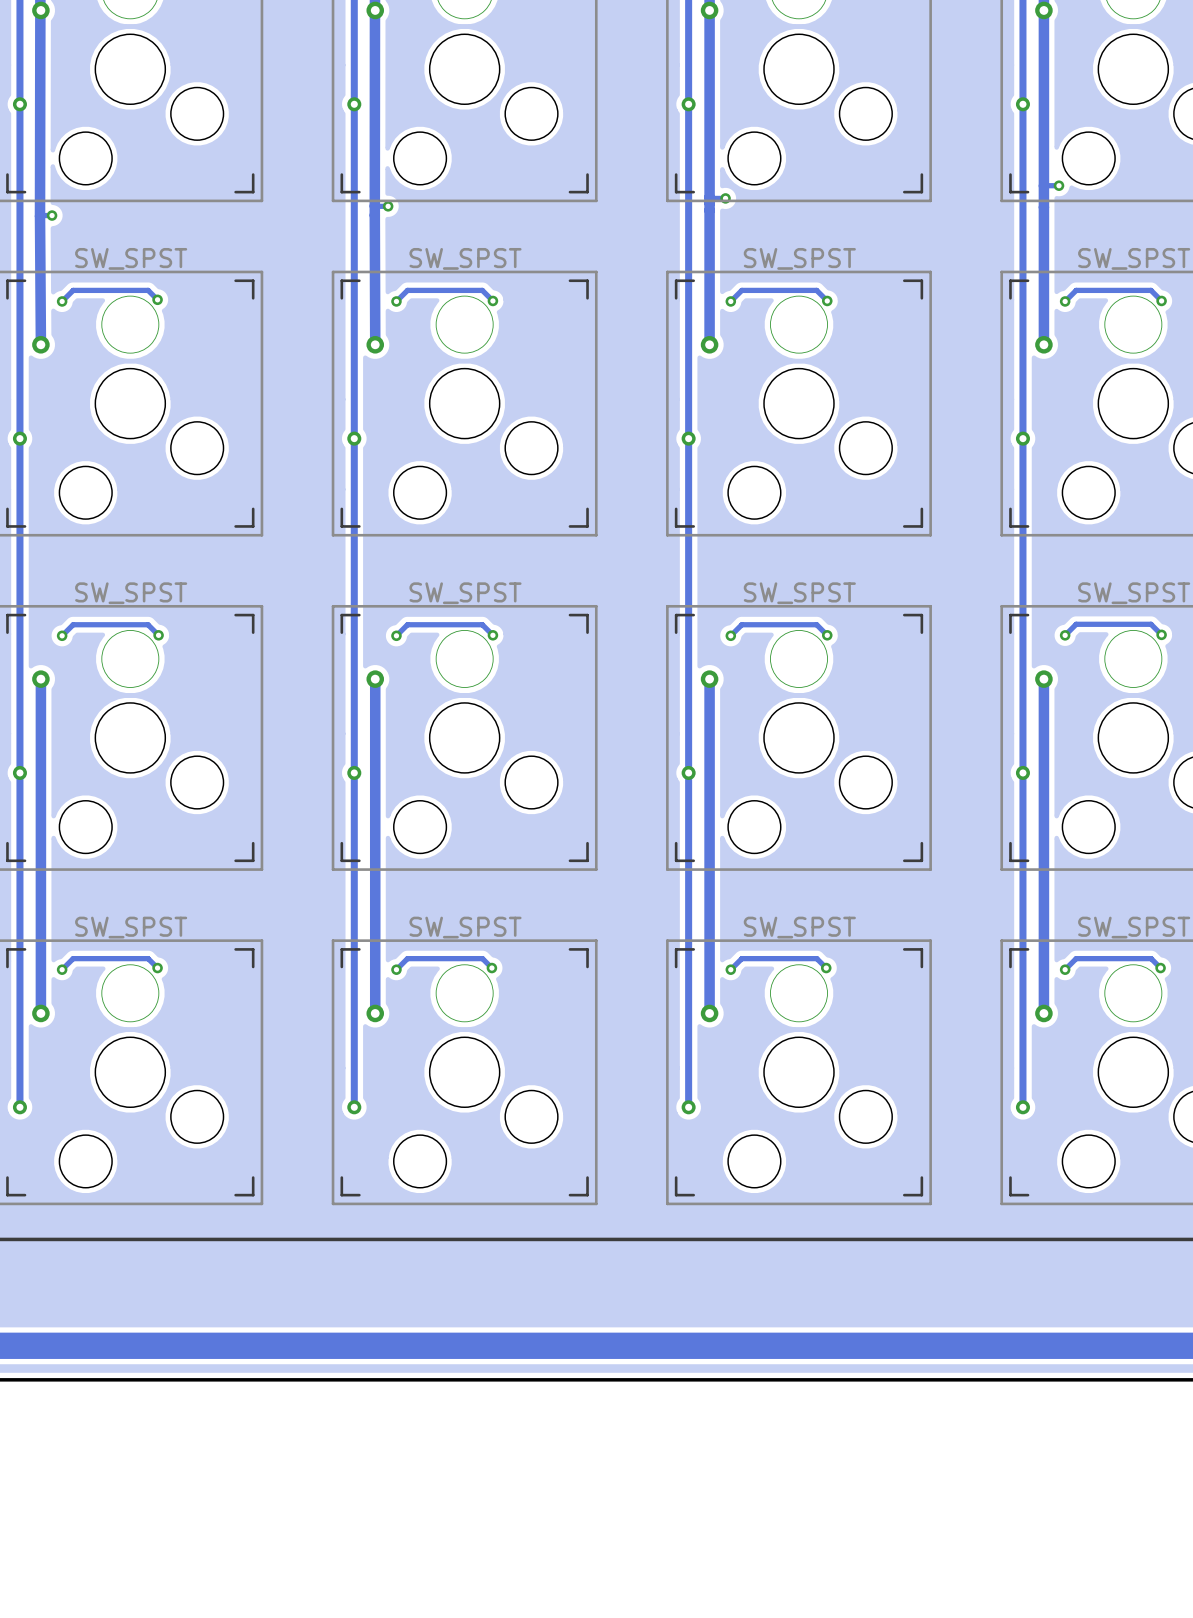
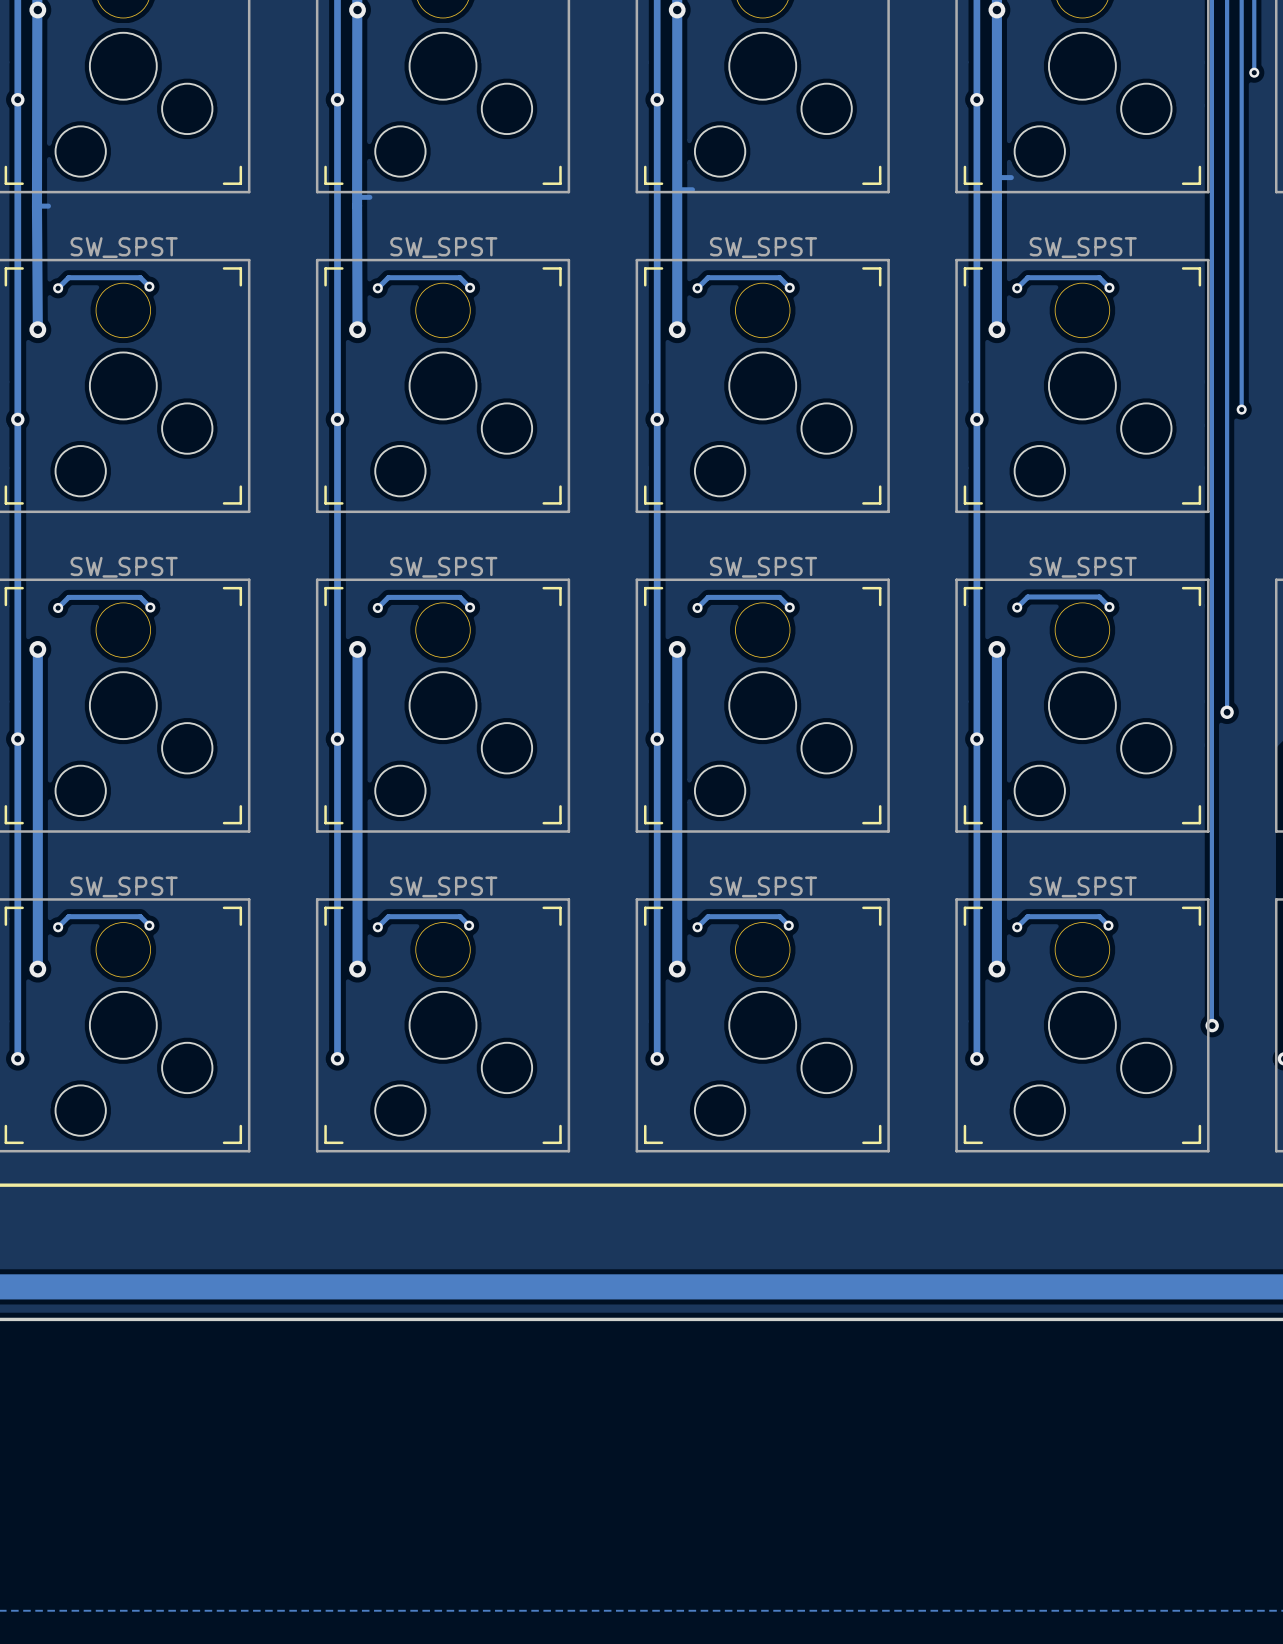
via: (1059, 185) -> none
via: (725, 198) -> none
via: (388, 206) -> none
via: (52, 215) -> none

